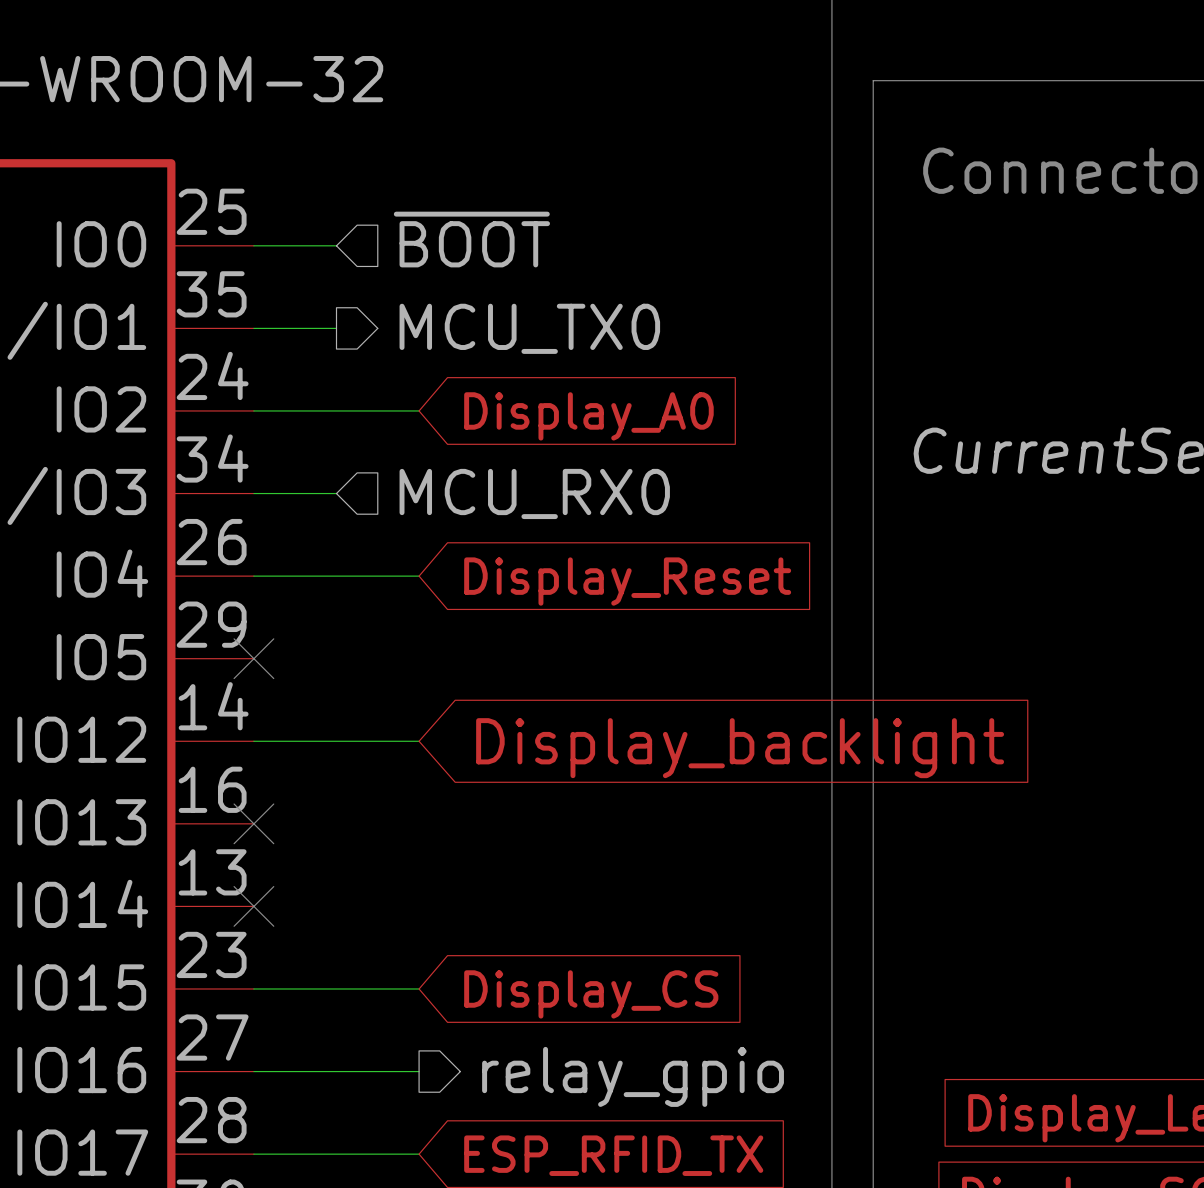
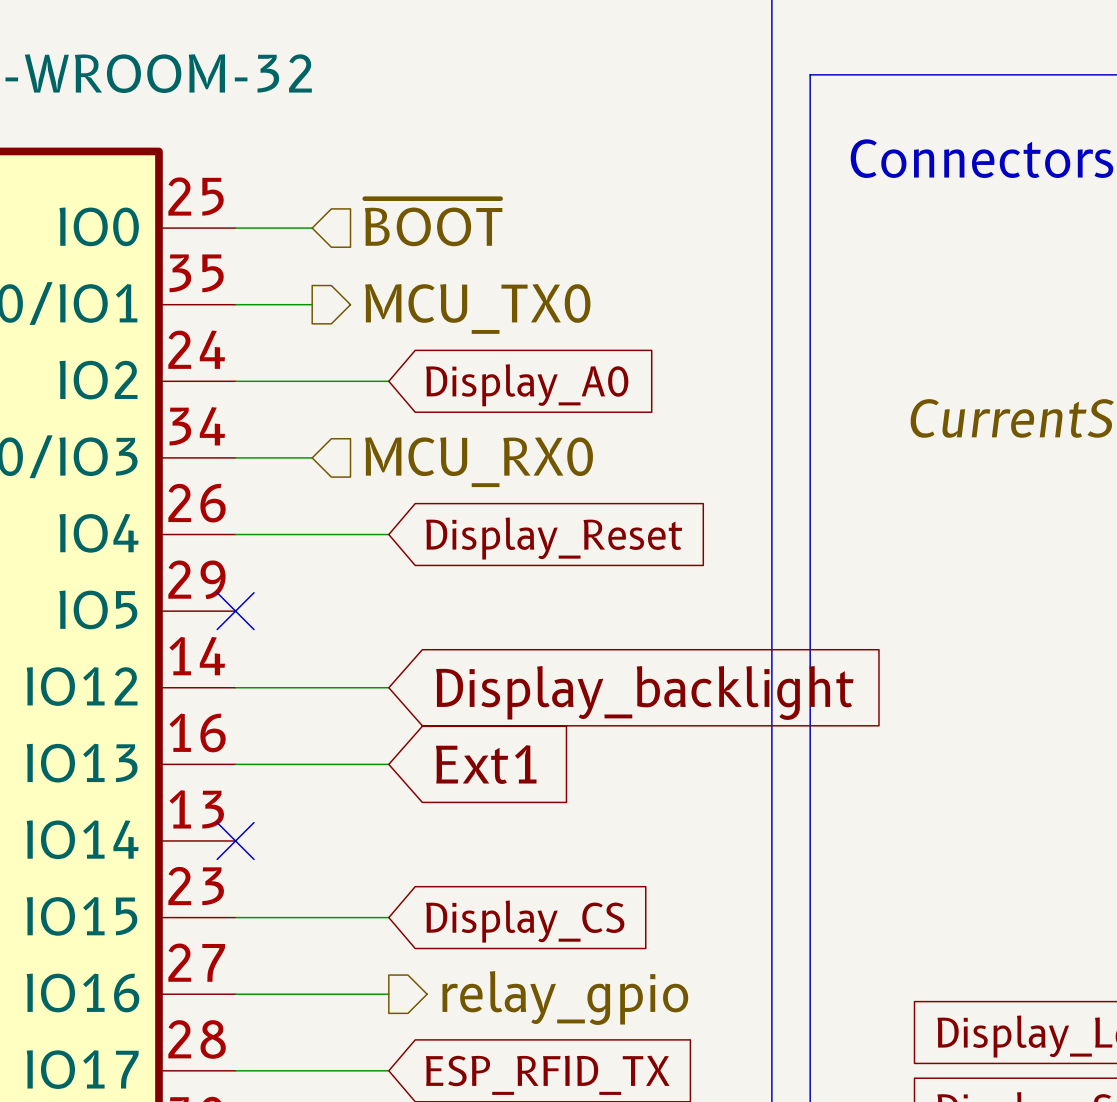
wire: none -> (235, 764) (388, 764)
no-connect mark: (253, 823) -> none
global label: none -> Ext1 (486, 764)

